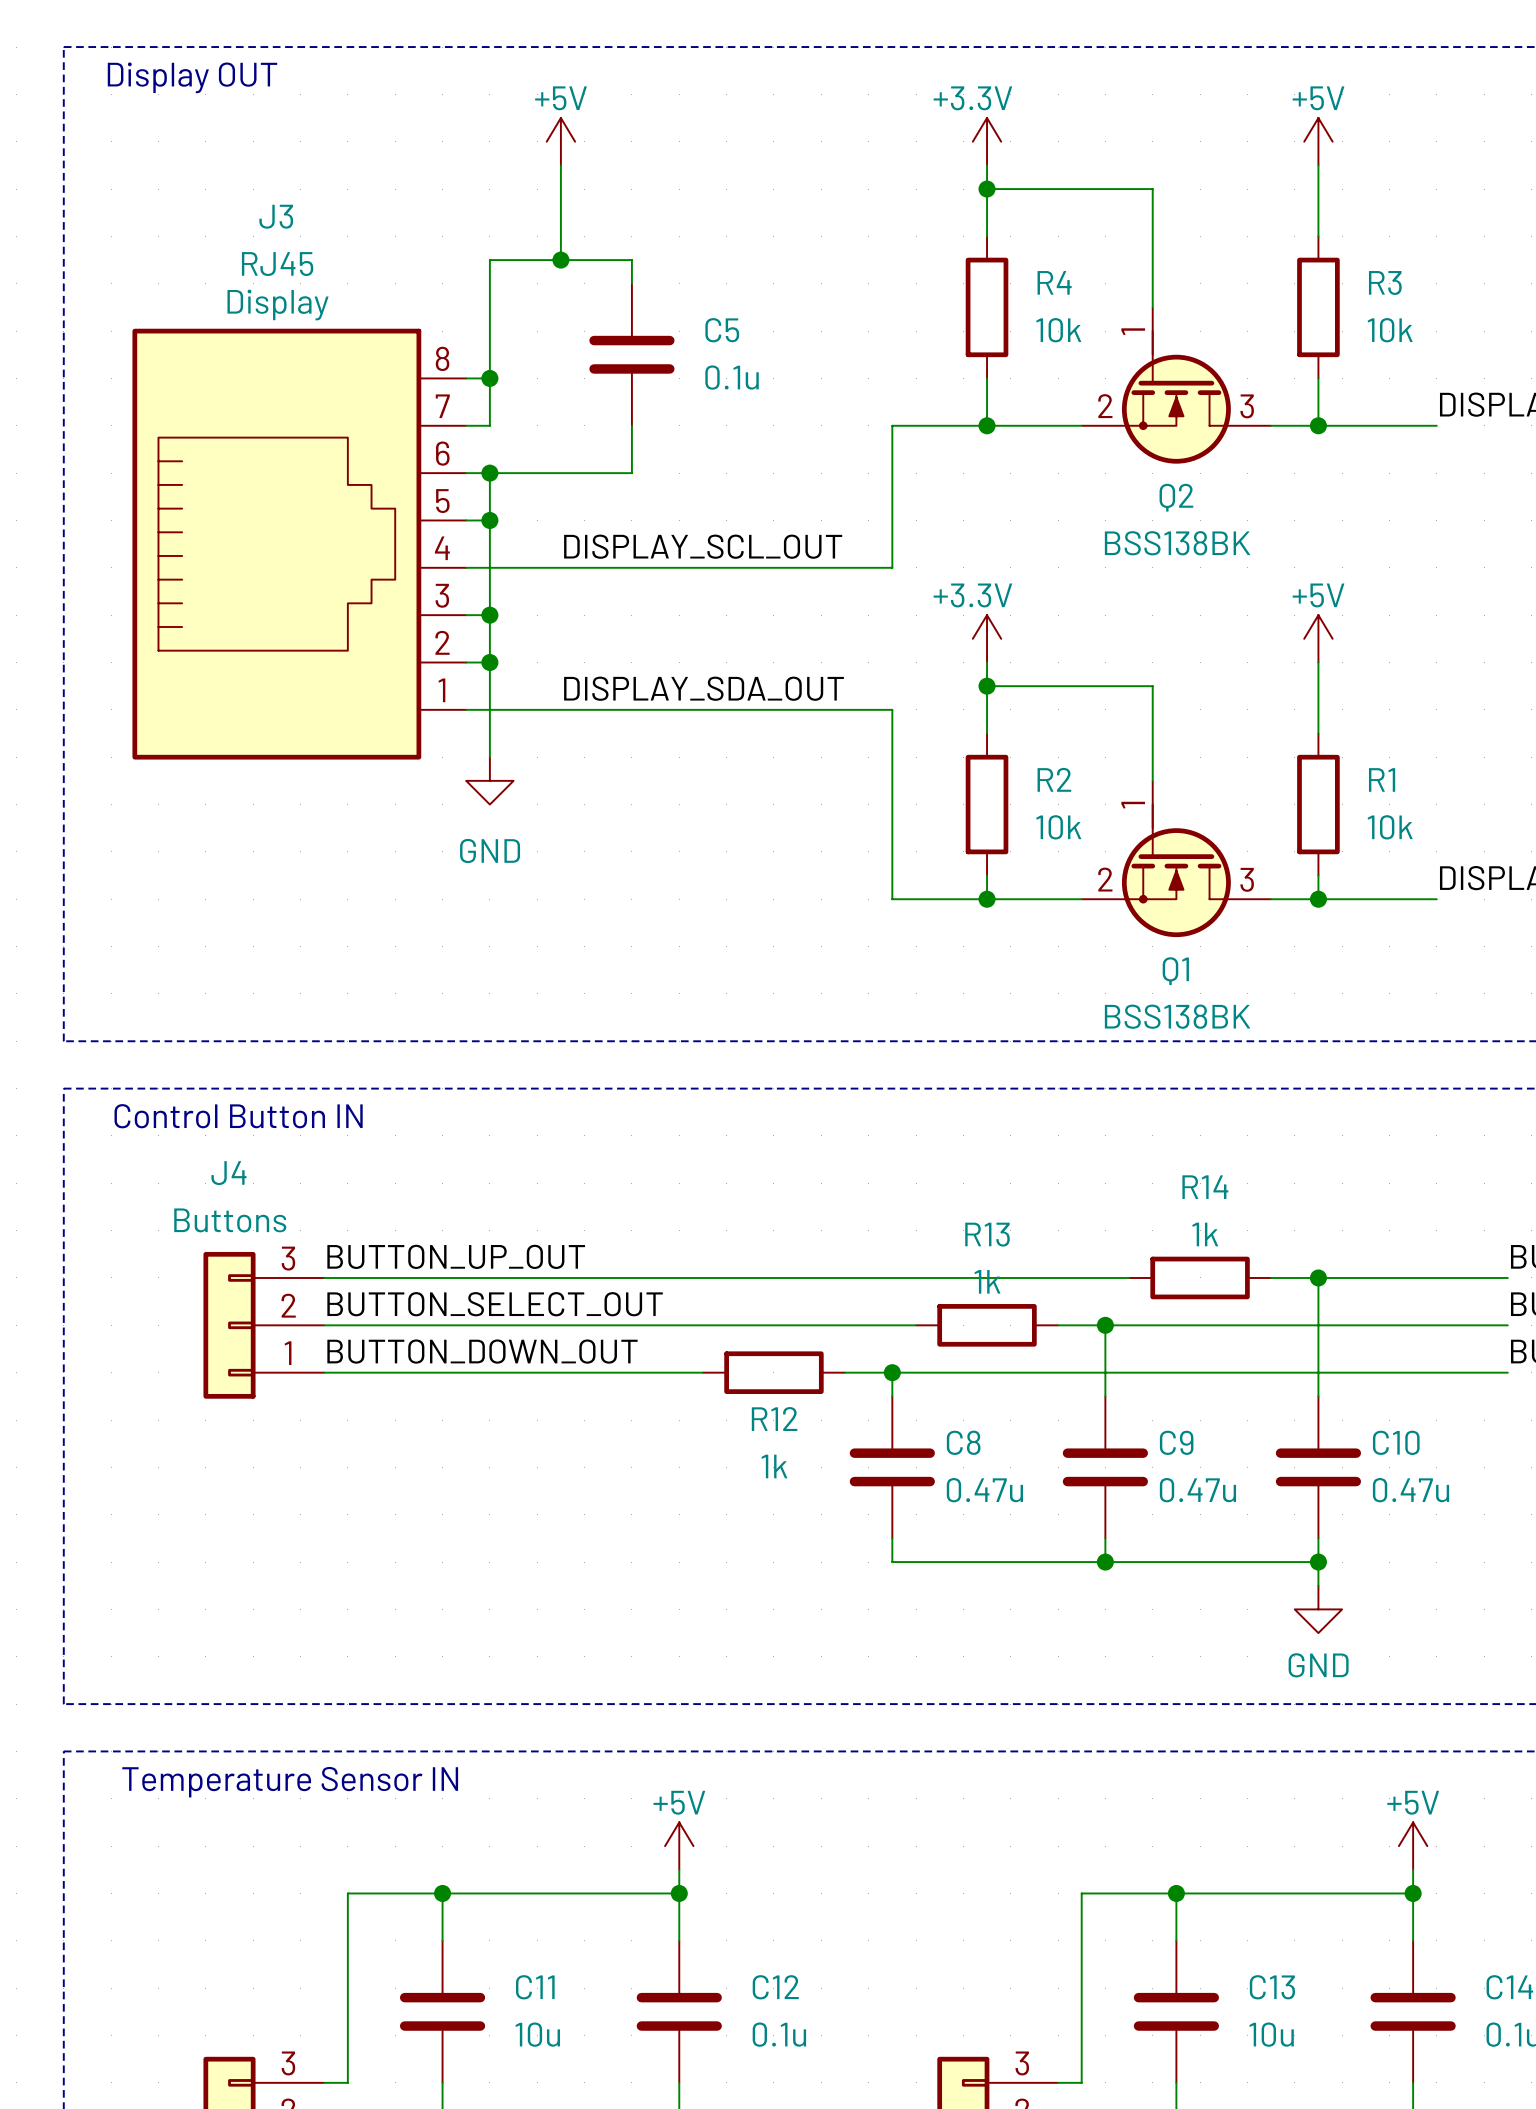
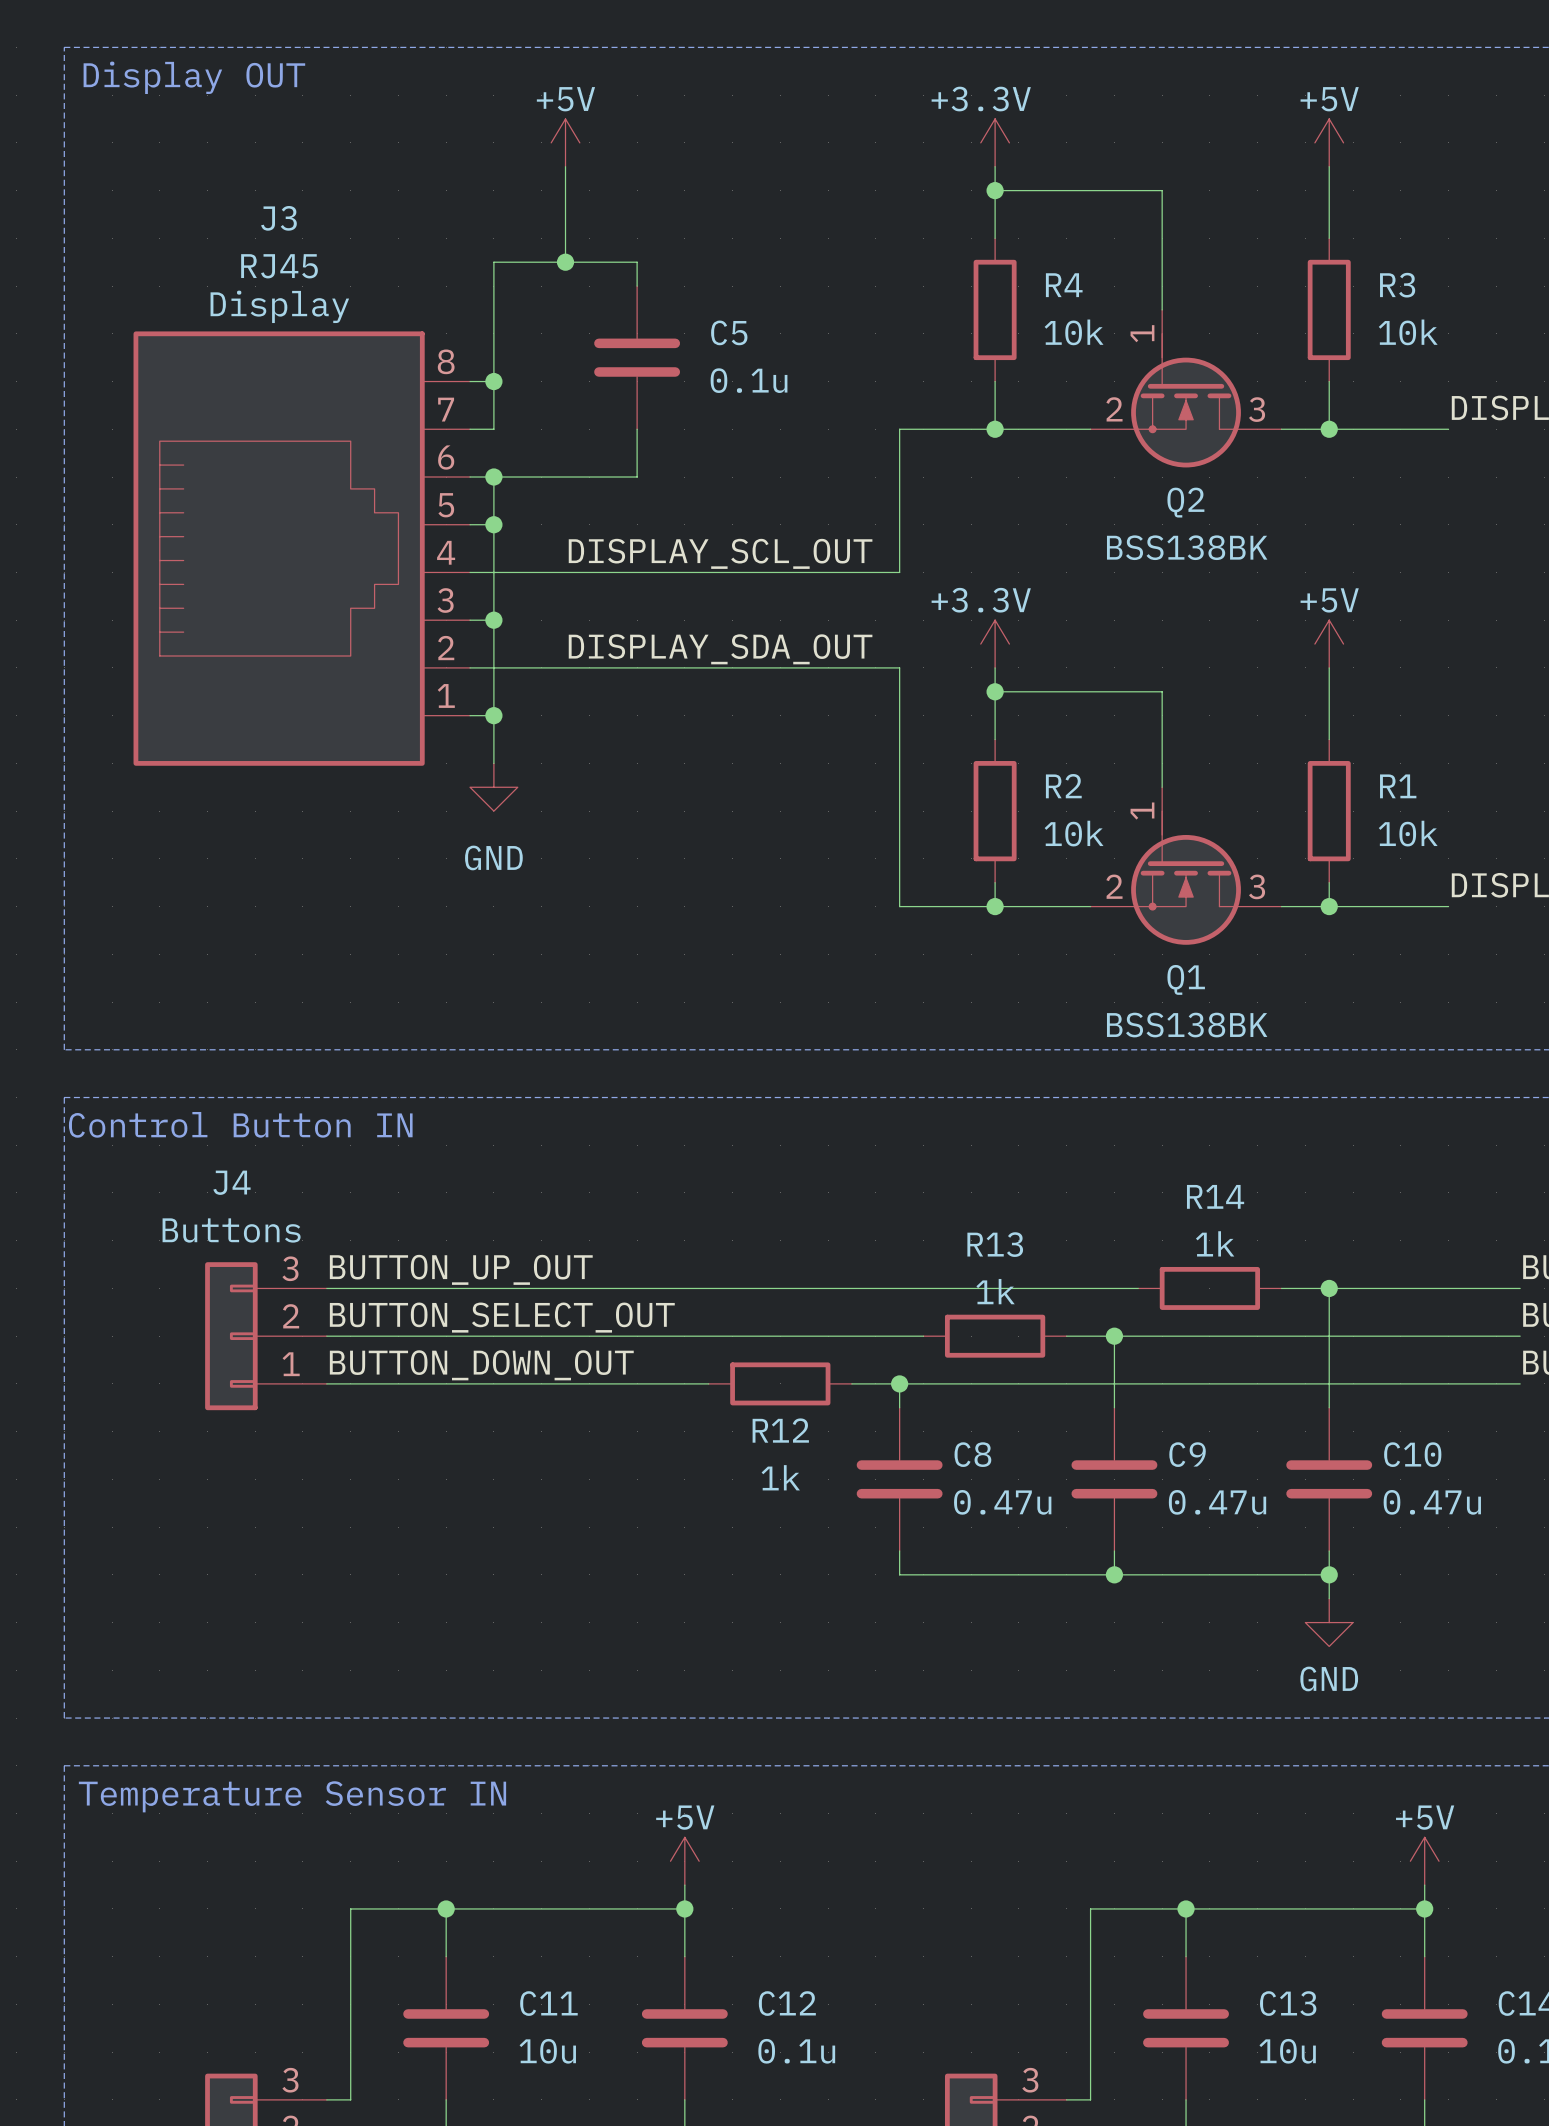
junction position: (489, 662) -> (493, 715)
label position: DISPLAY_SDA_OUT (703, 688) -> DISPLAY_SDA_OUT (720, 649)
wire: (489, 709) (892, 709) -> (493, 667) (899, 667) (899, 715)

